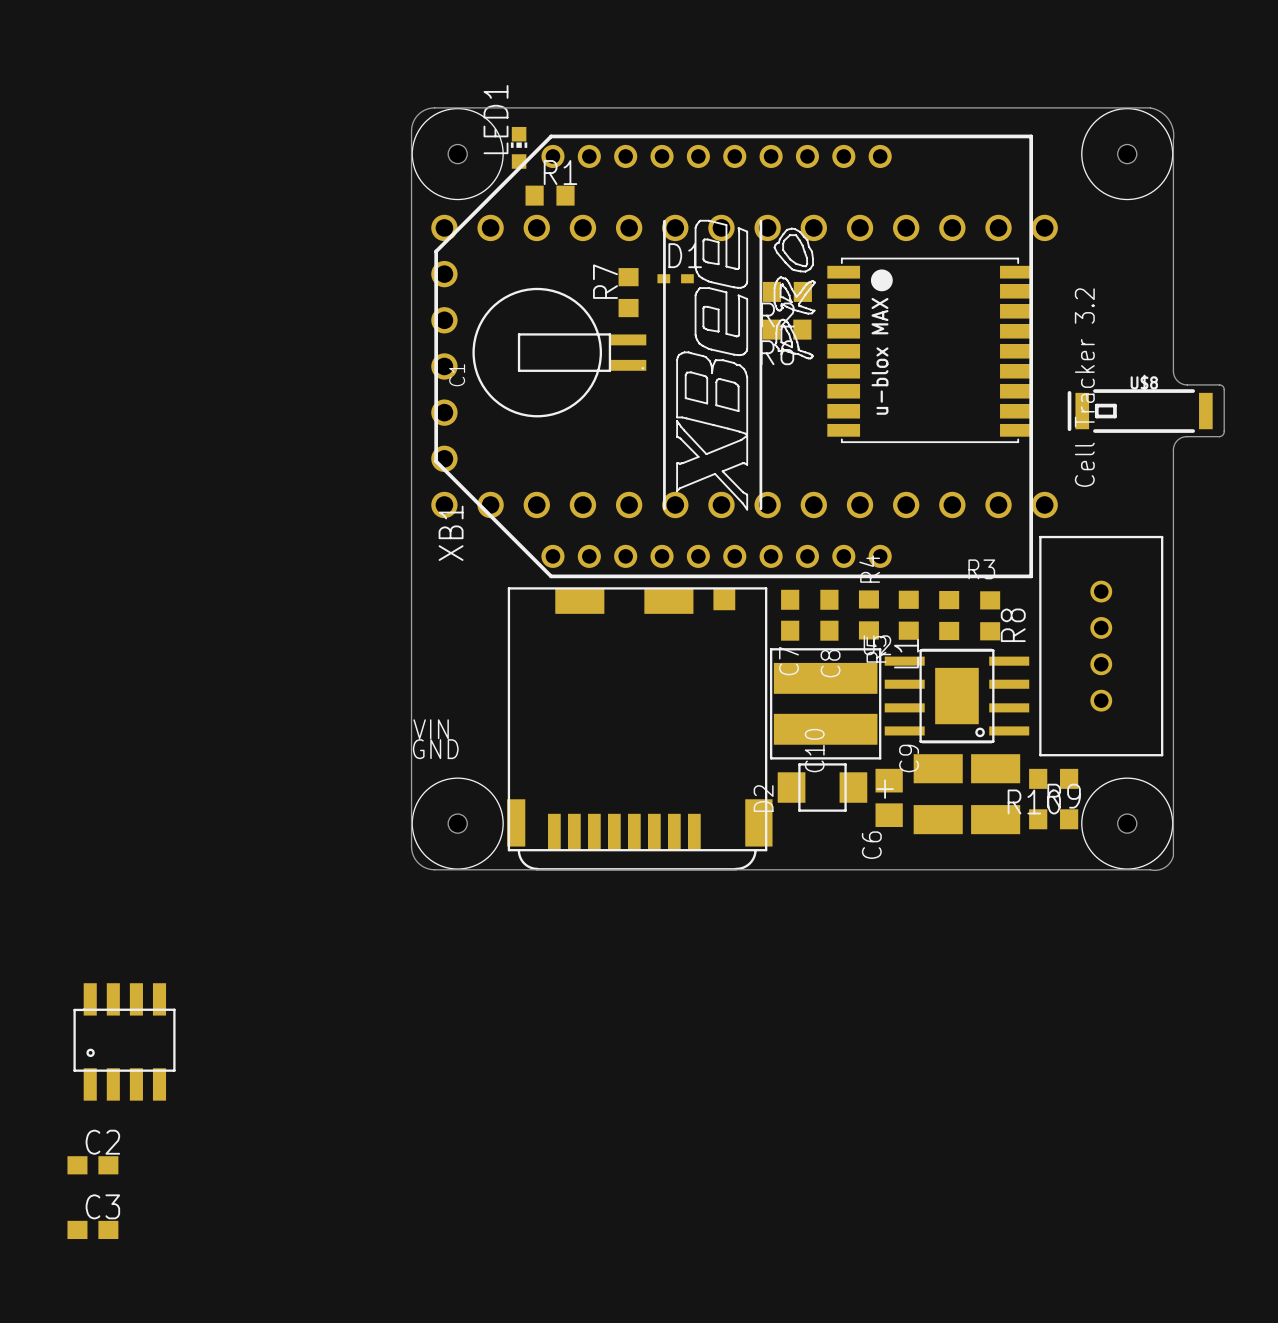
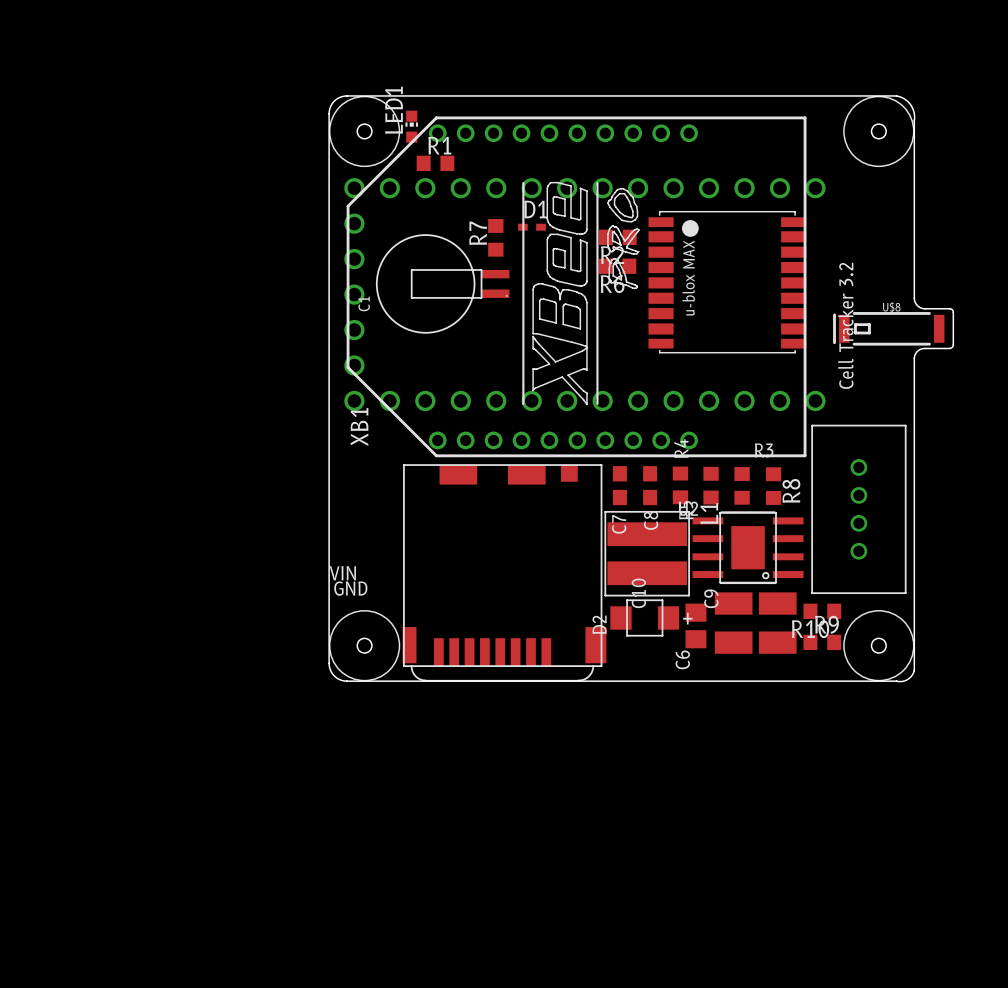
part: (124, 1041) -> none
C2: (92, 1165) -> none
C3: (92, 1229) -> none

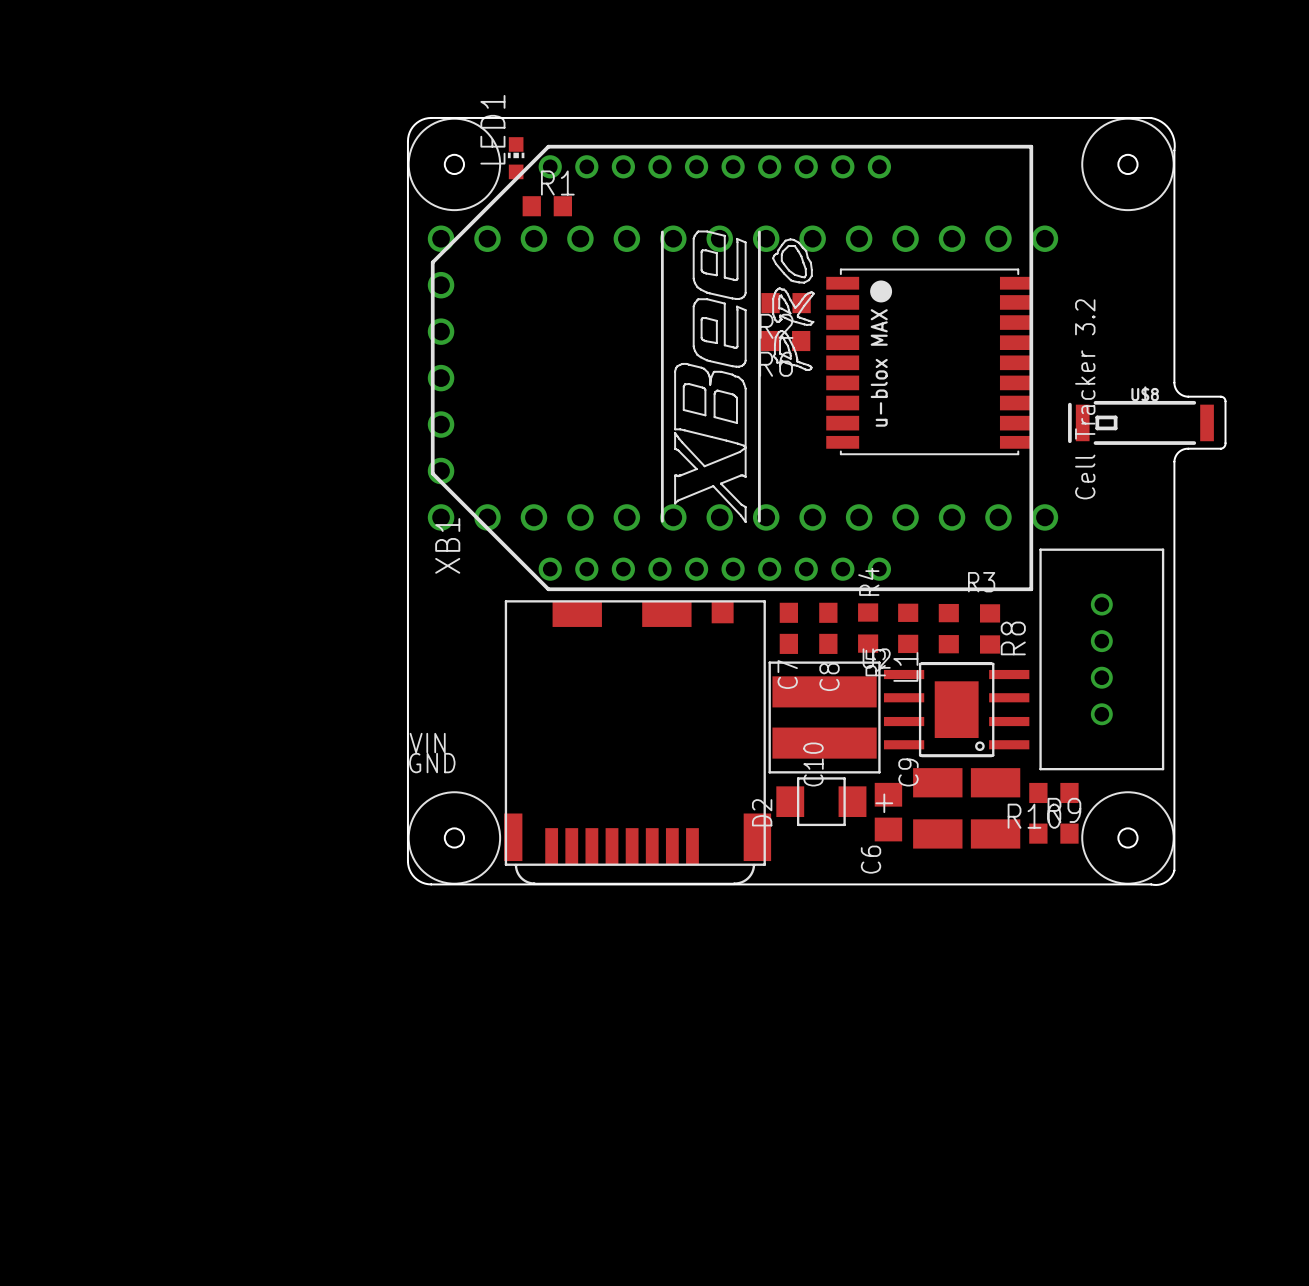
D1: (531, 227) -> none
R7: (495, 237) -> none
C1: (442, 283) -> none

